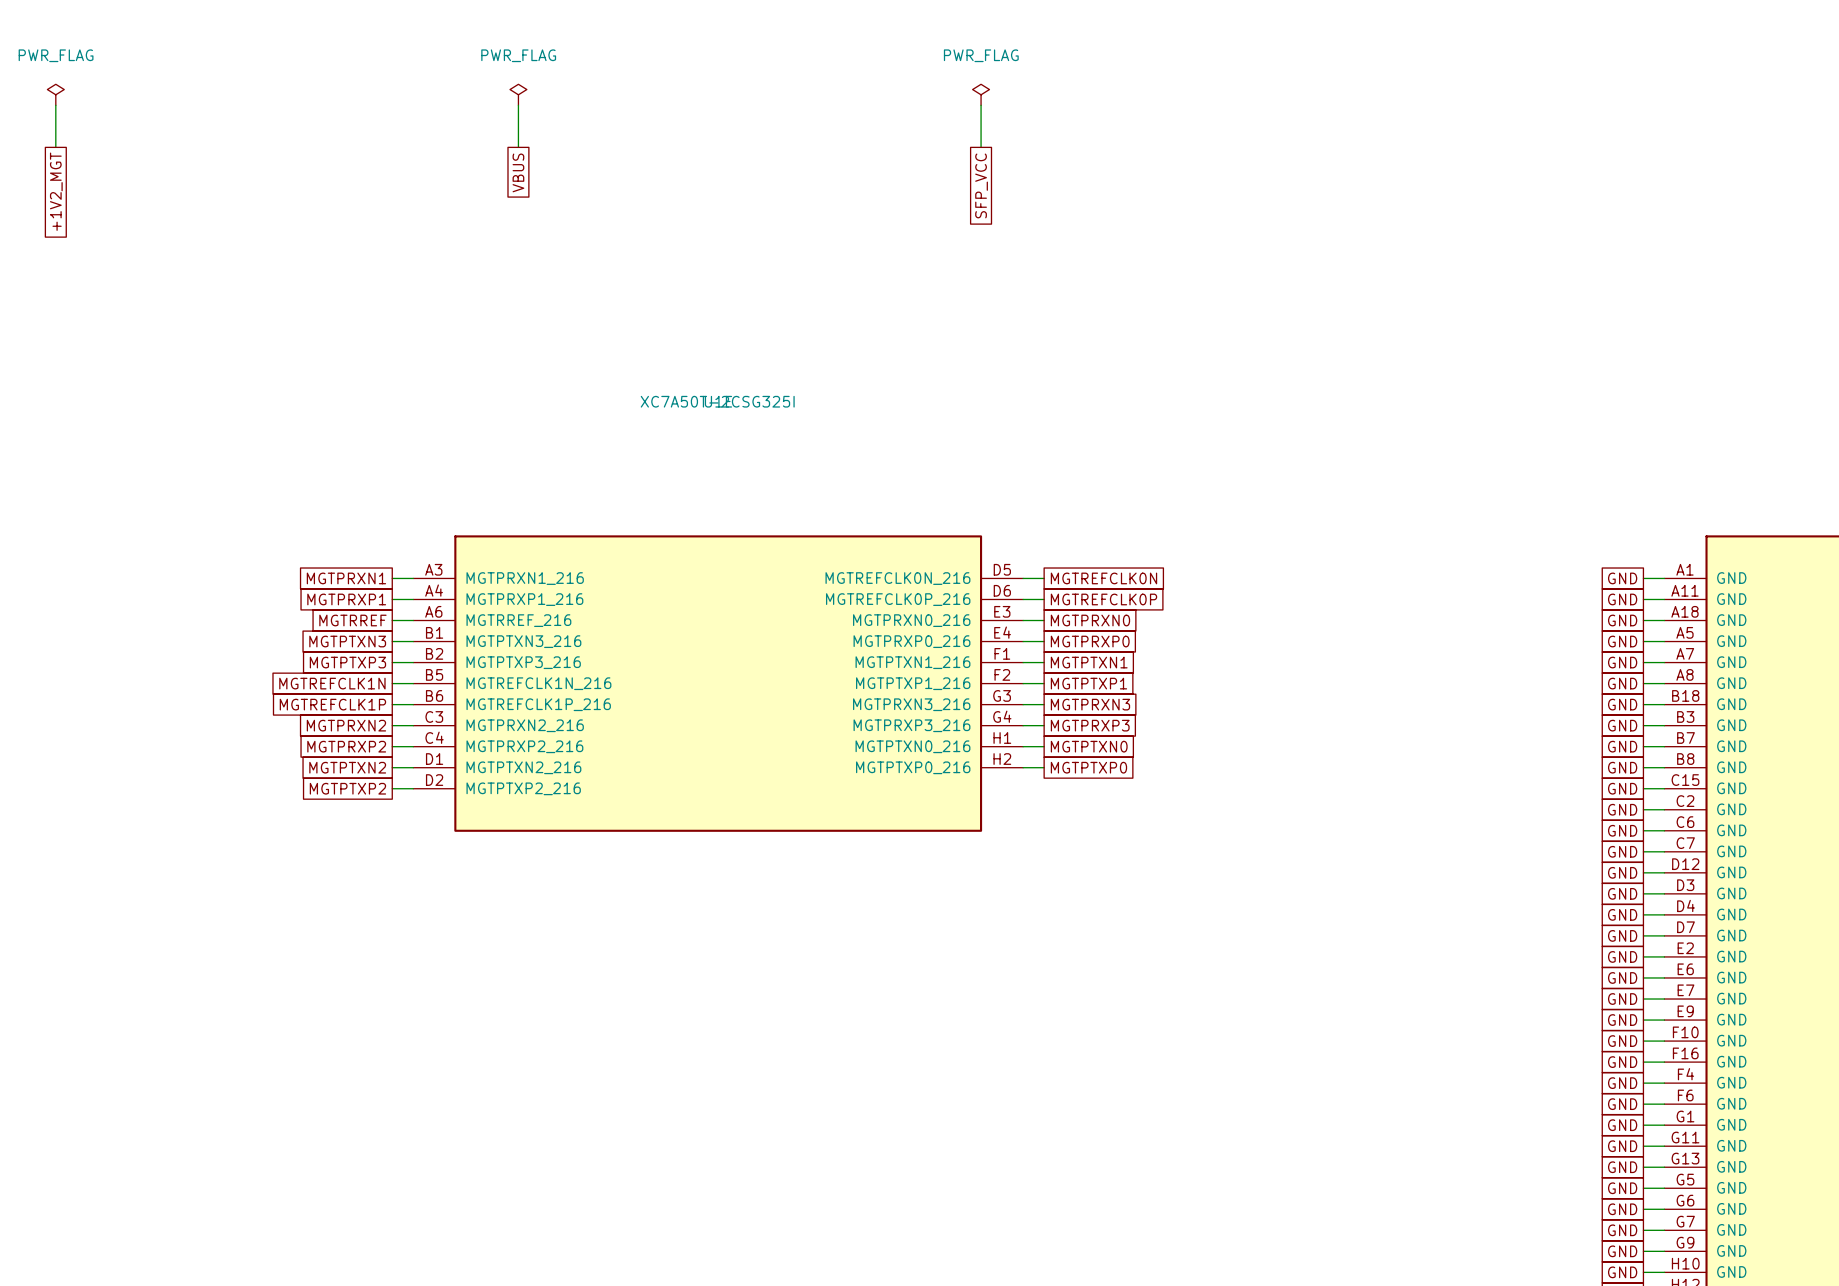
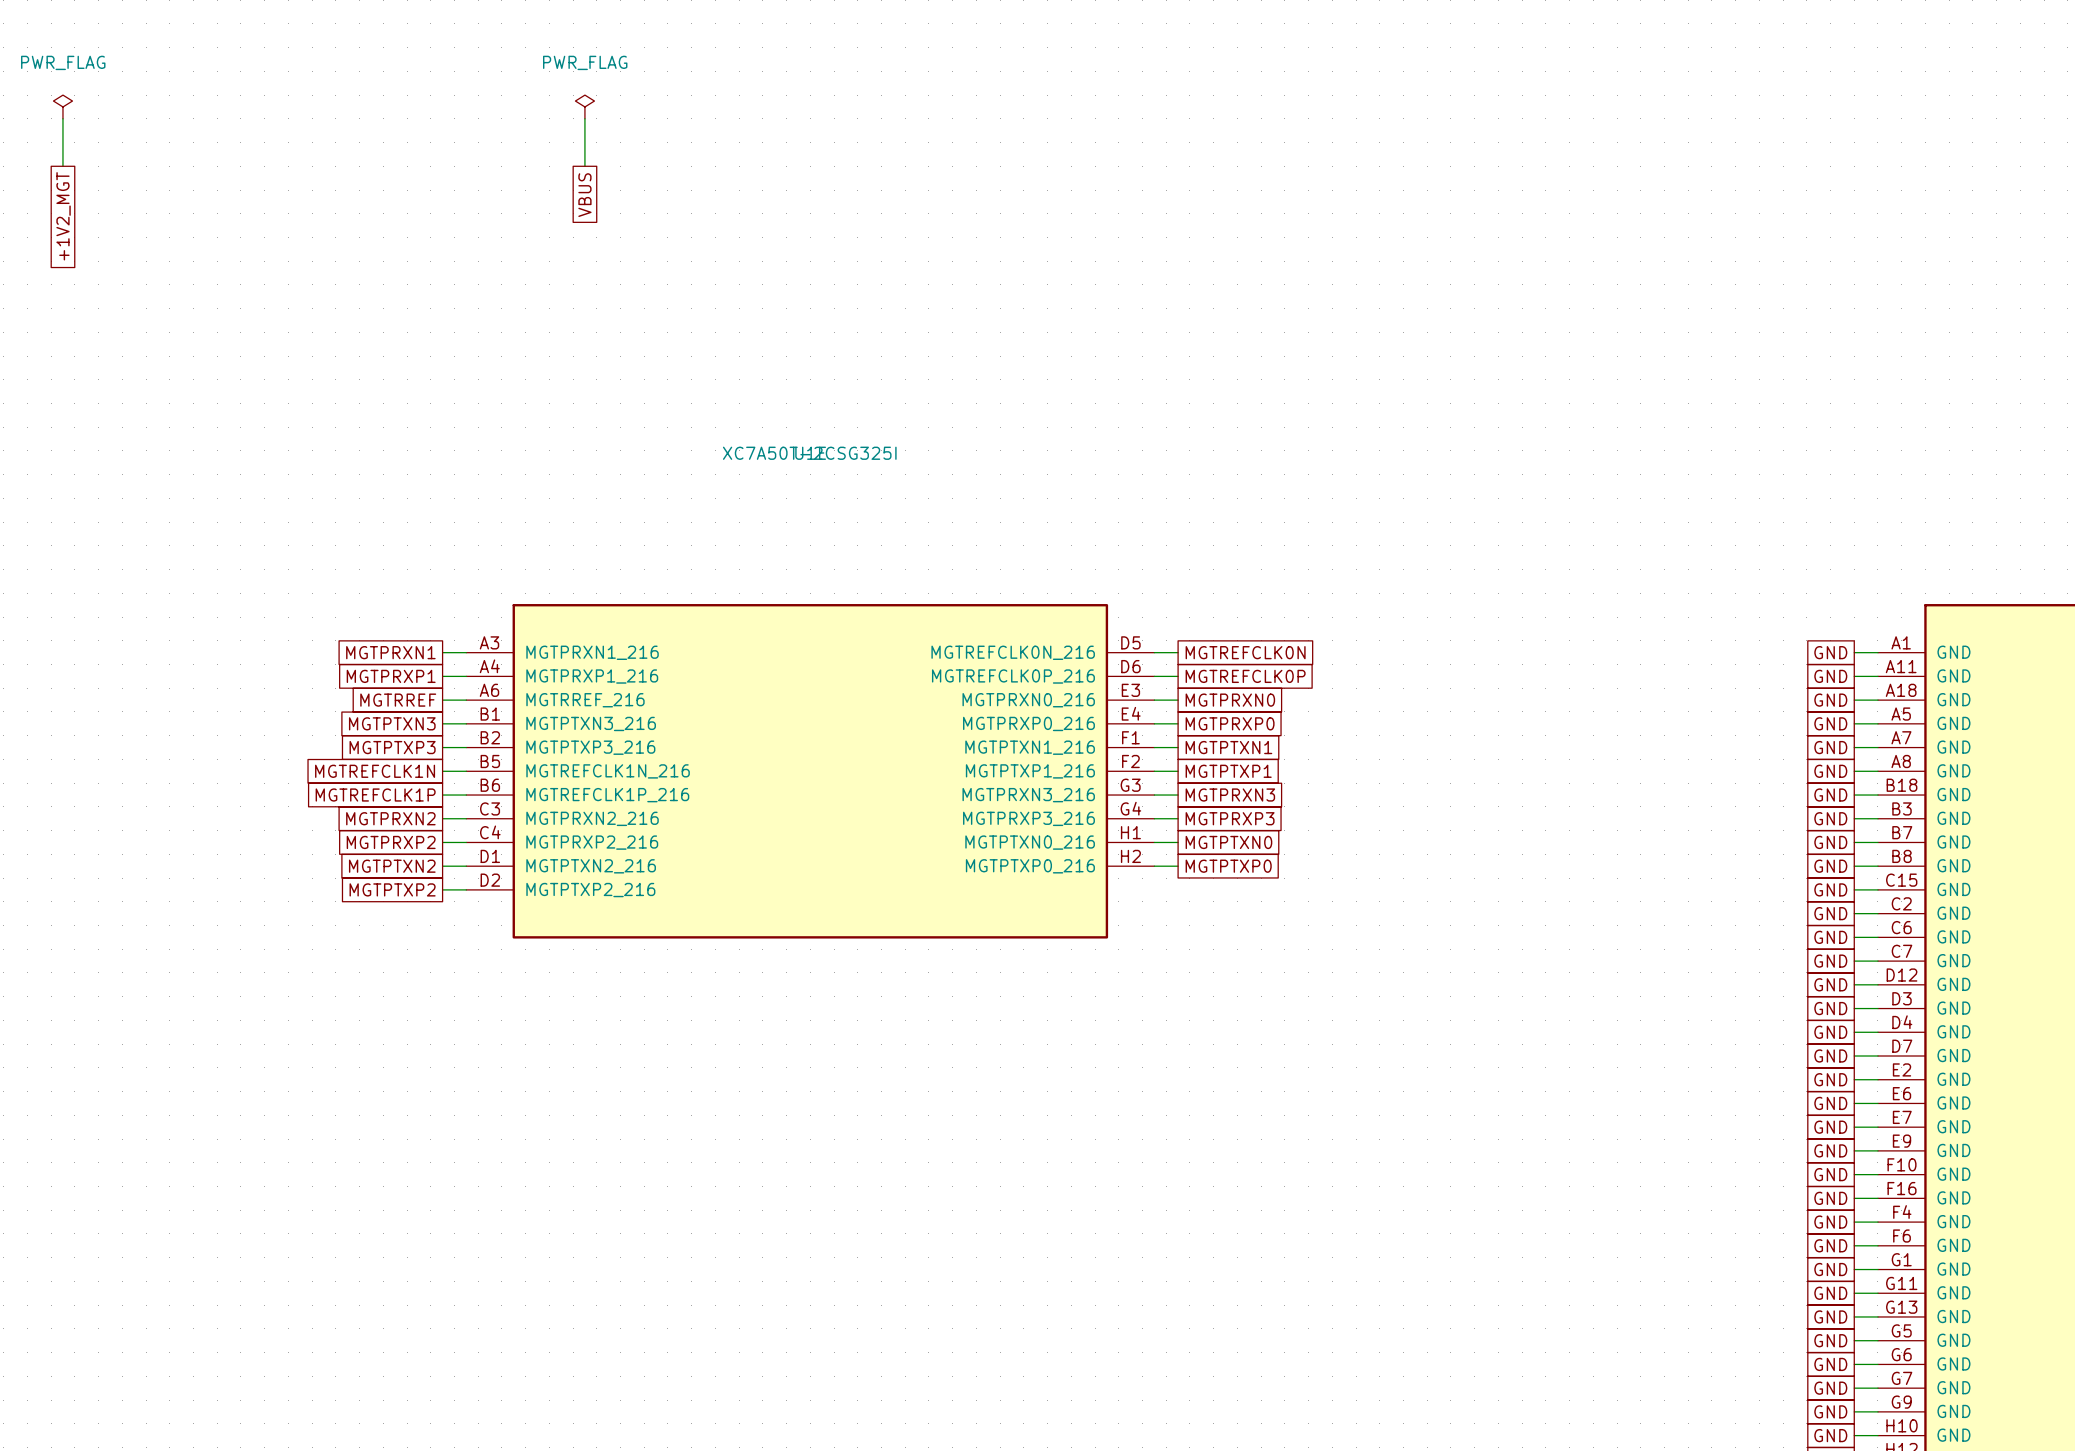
power symbol: PWR_FLAG (981, 94) -> none
wire: (981, 105) (981, 147) -> none
global label: SFP_VCC (981, 185) -> none

